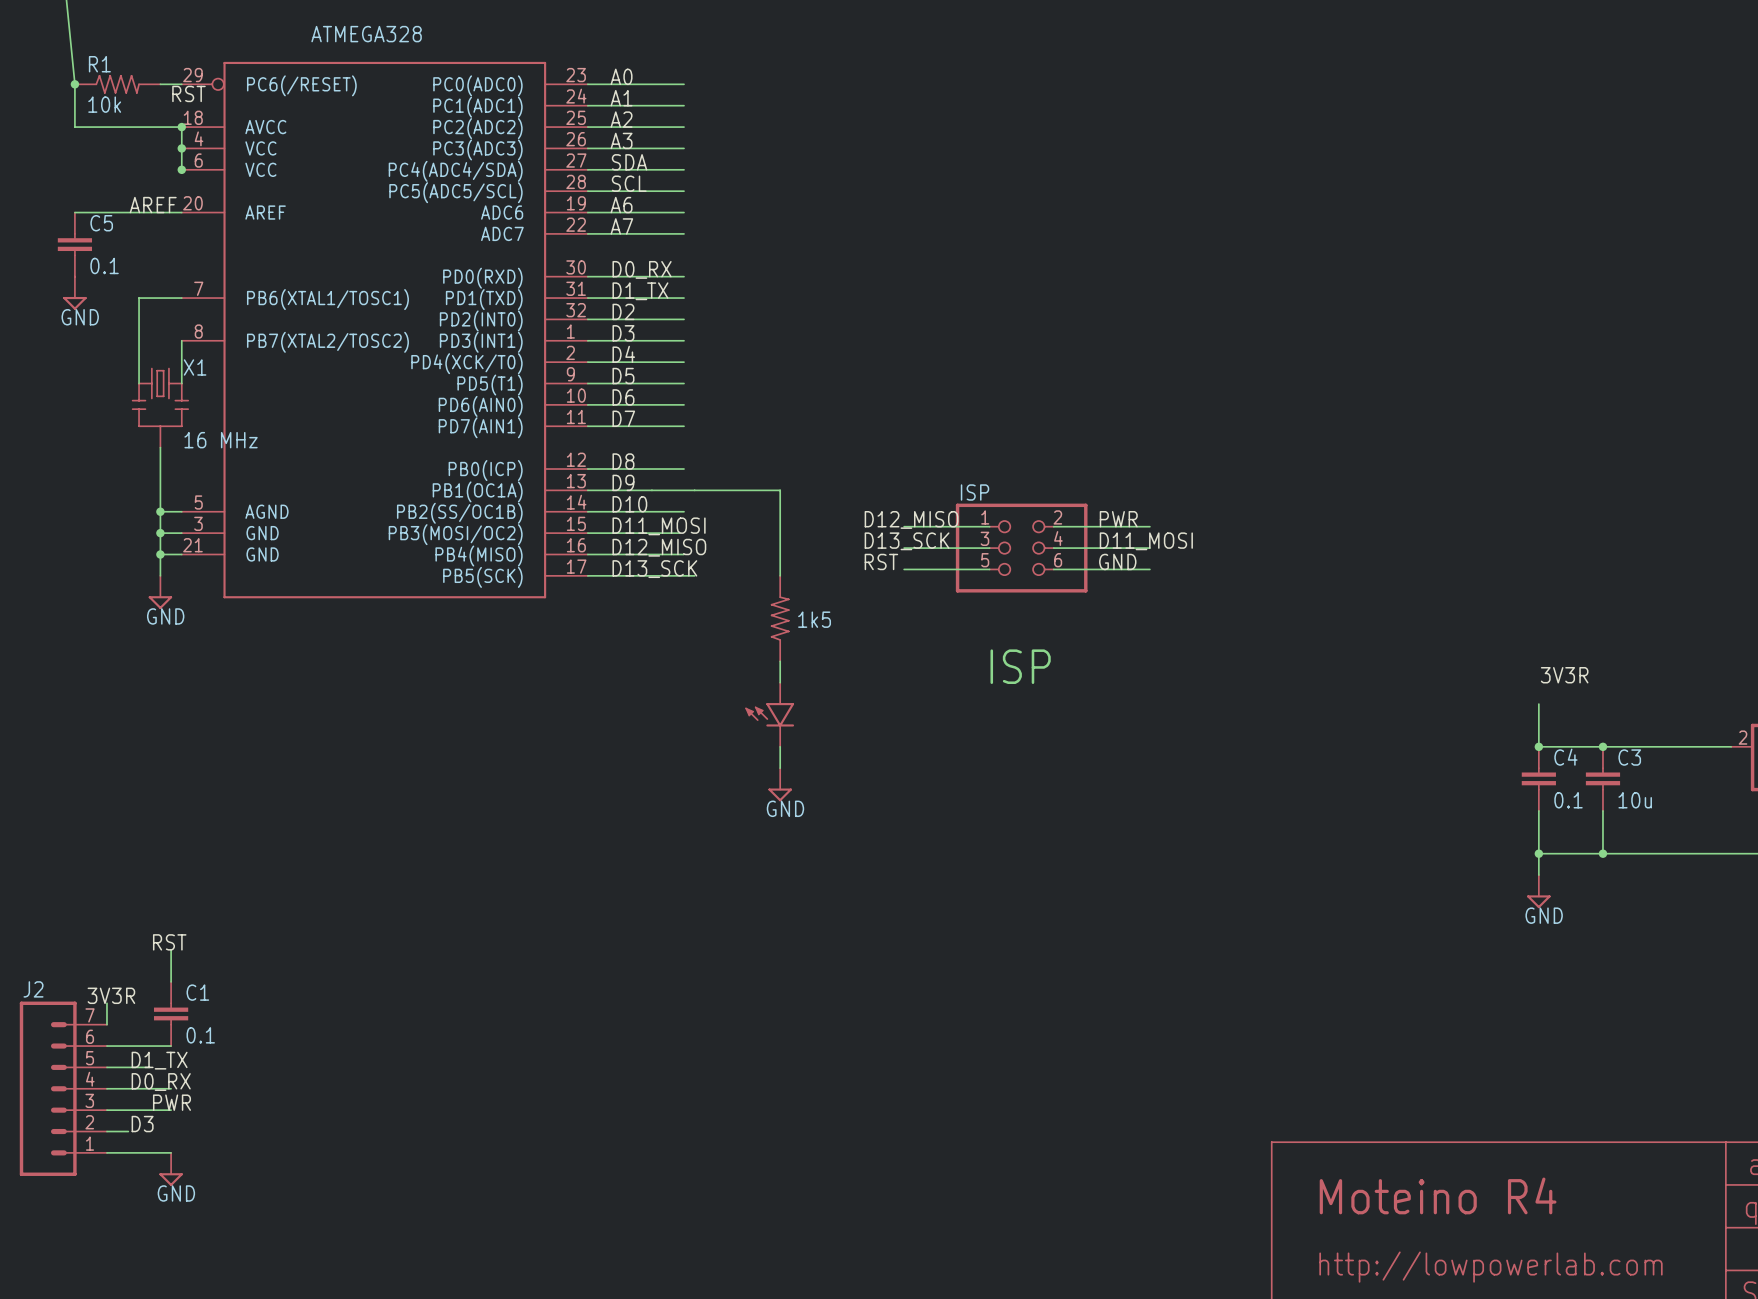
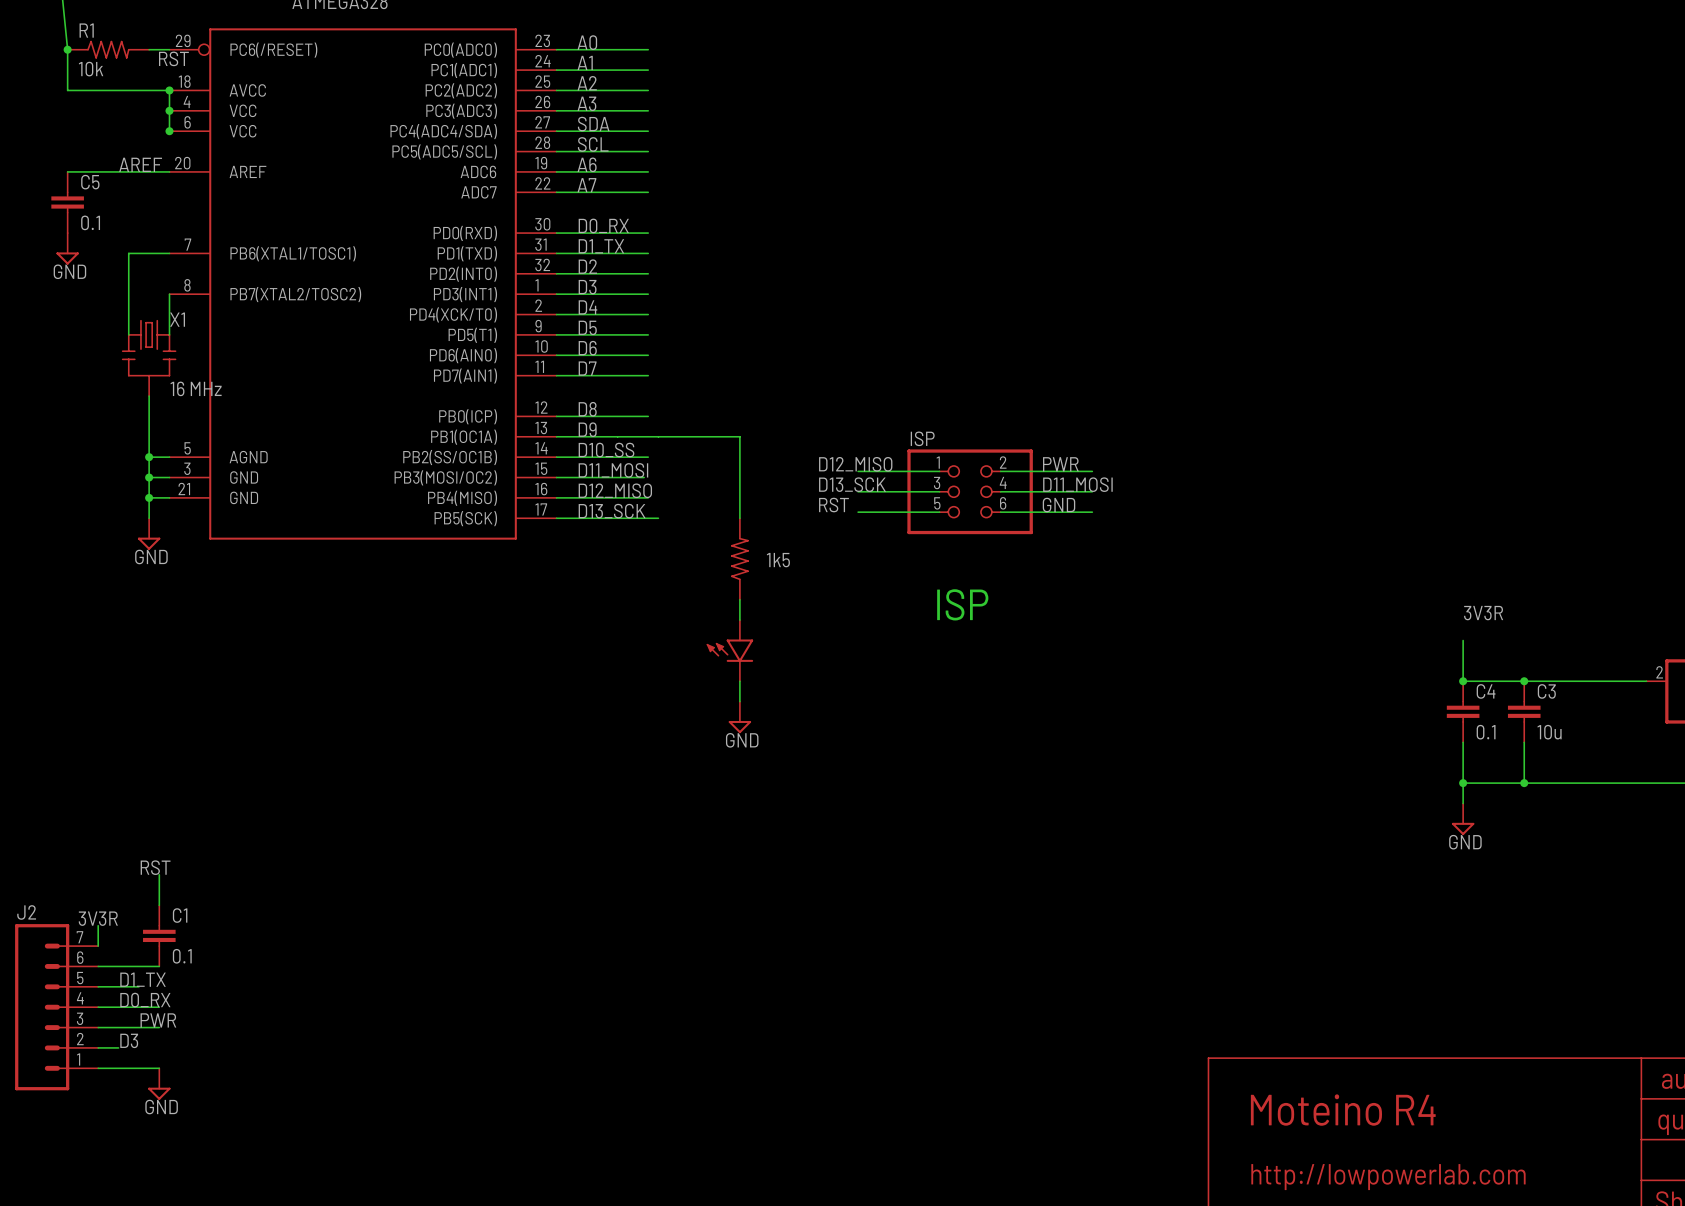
label: D10 (629, 504) -> D10_SS (606, 450)

